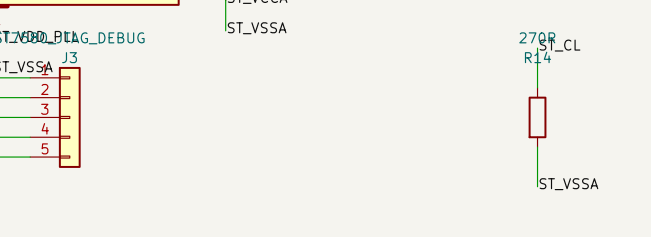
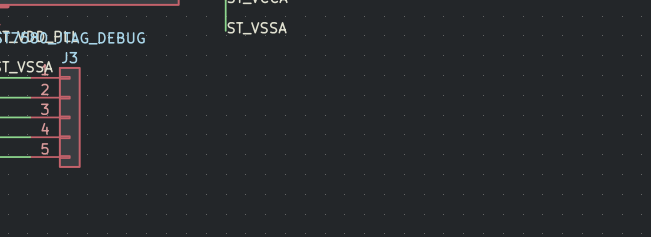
label: ST_CL (559, 45) -> none
wire: (537, 48) (537, 87) -> none
R14: 270R (537, 117) -> none
wire: (537, 147) (537, 186) -> none
label: ST_VSSA (568, 184) -> none

